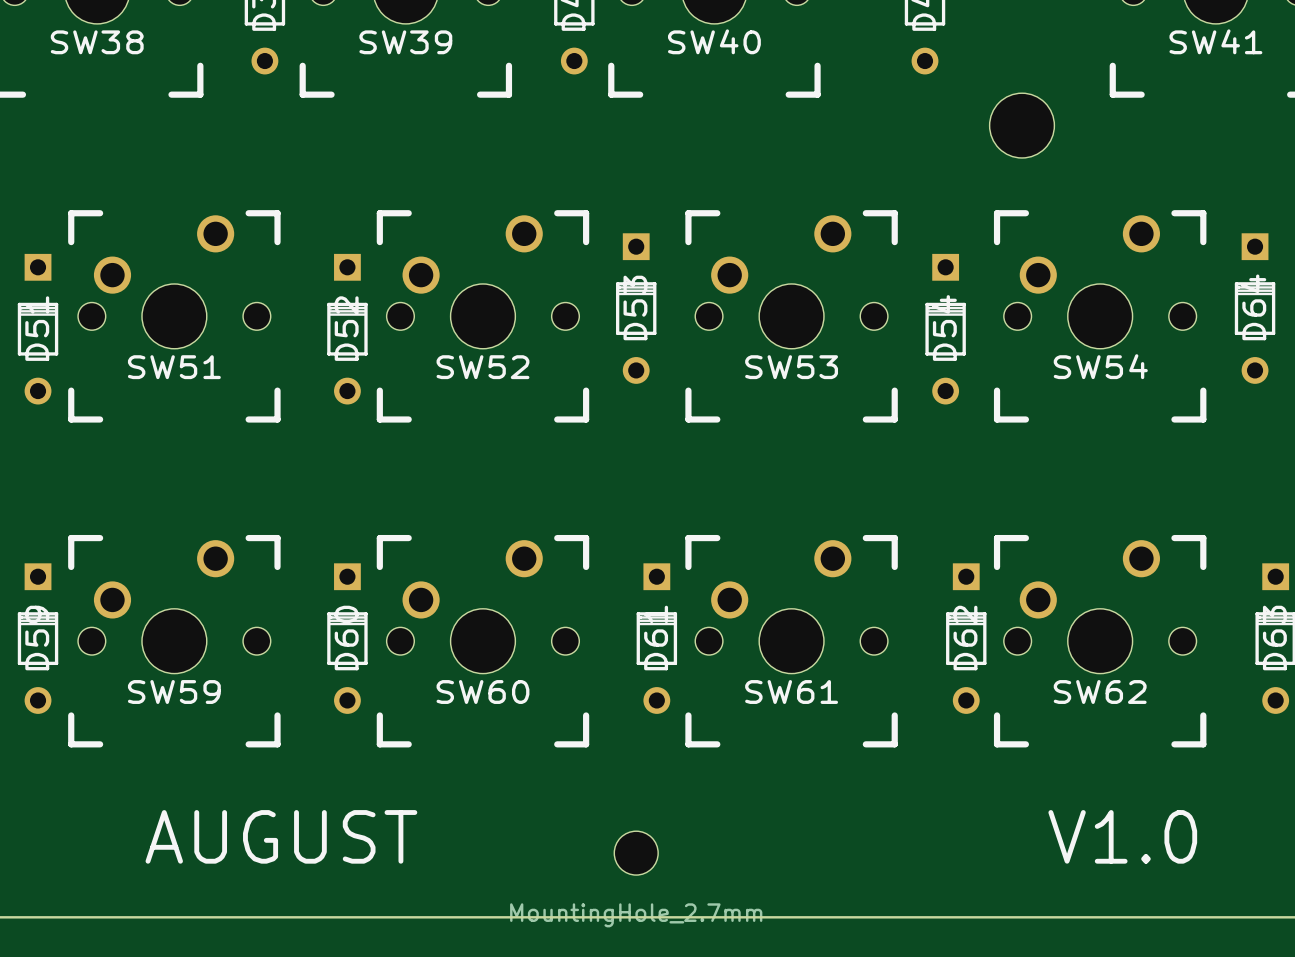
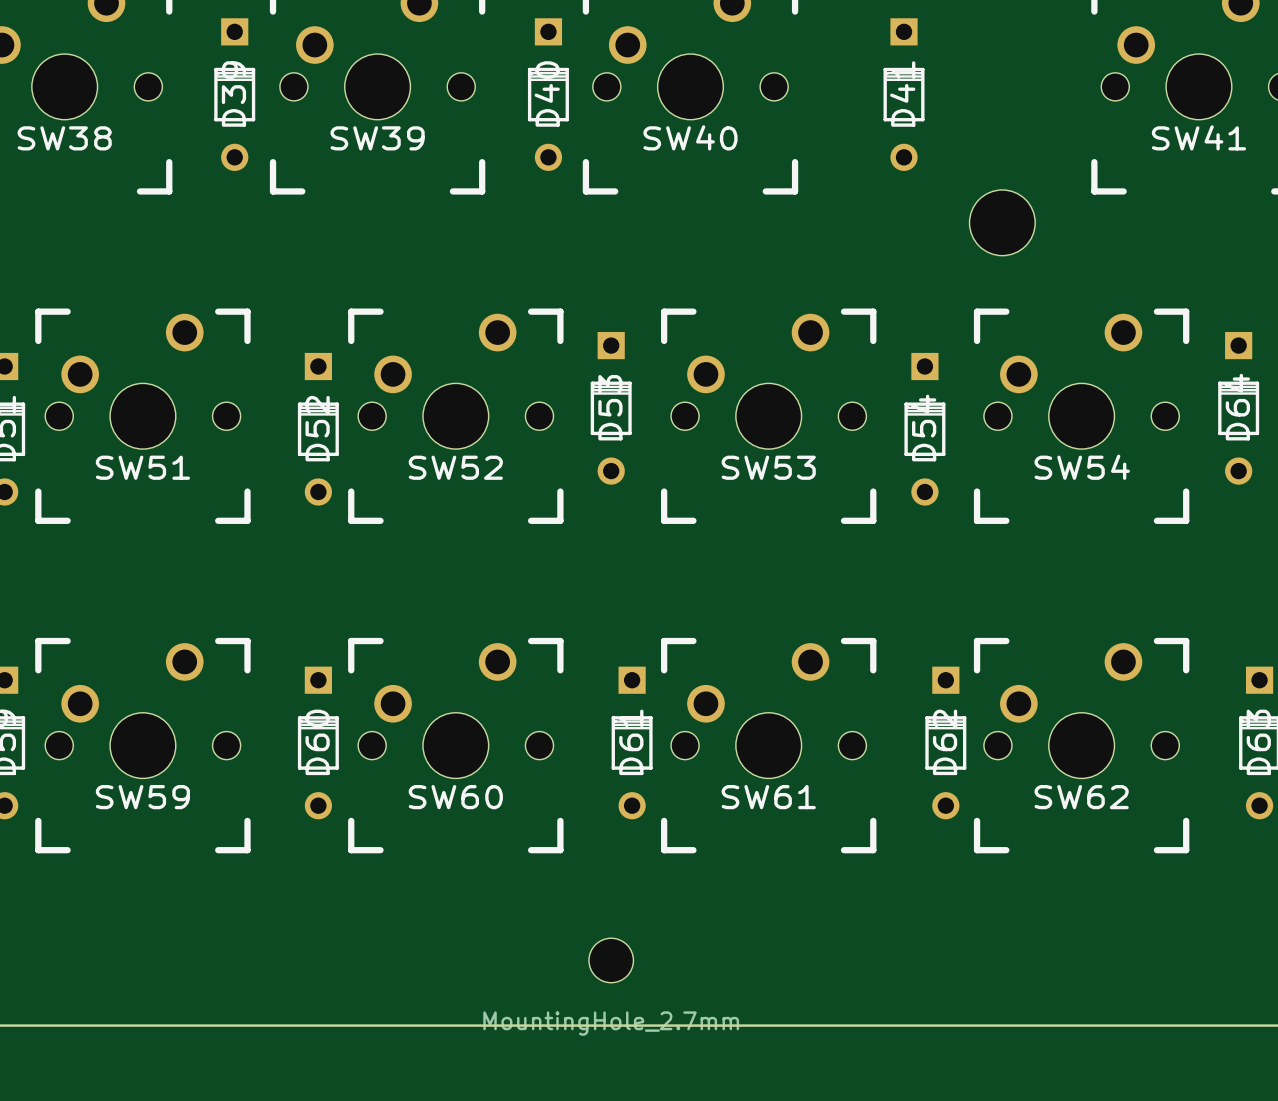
text: AUGUST (281, 836) -> none
text: V1.0 (1122, 836) -> none

